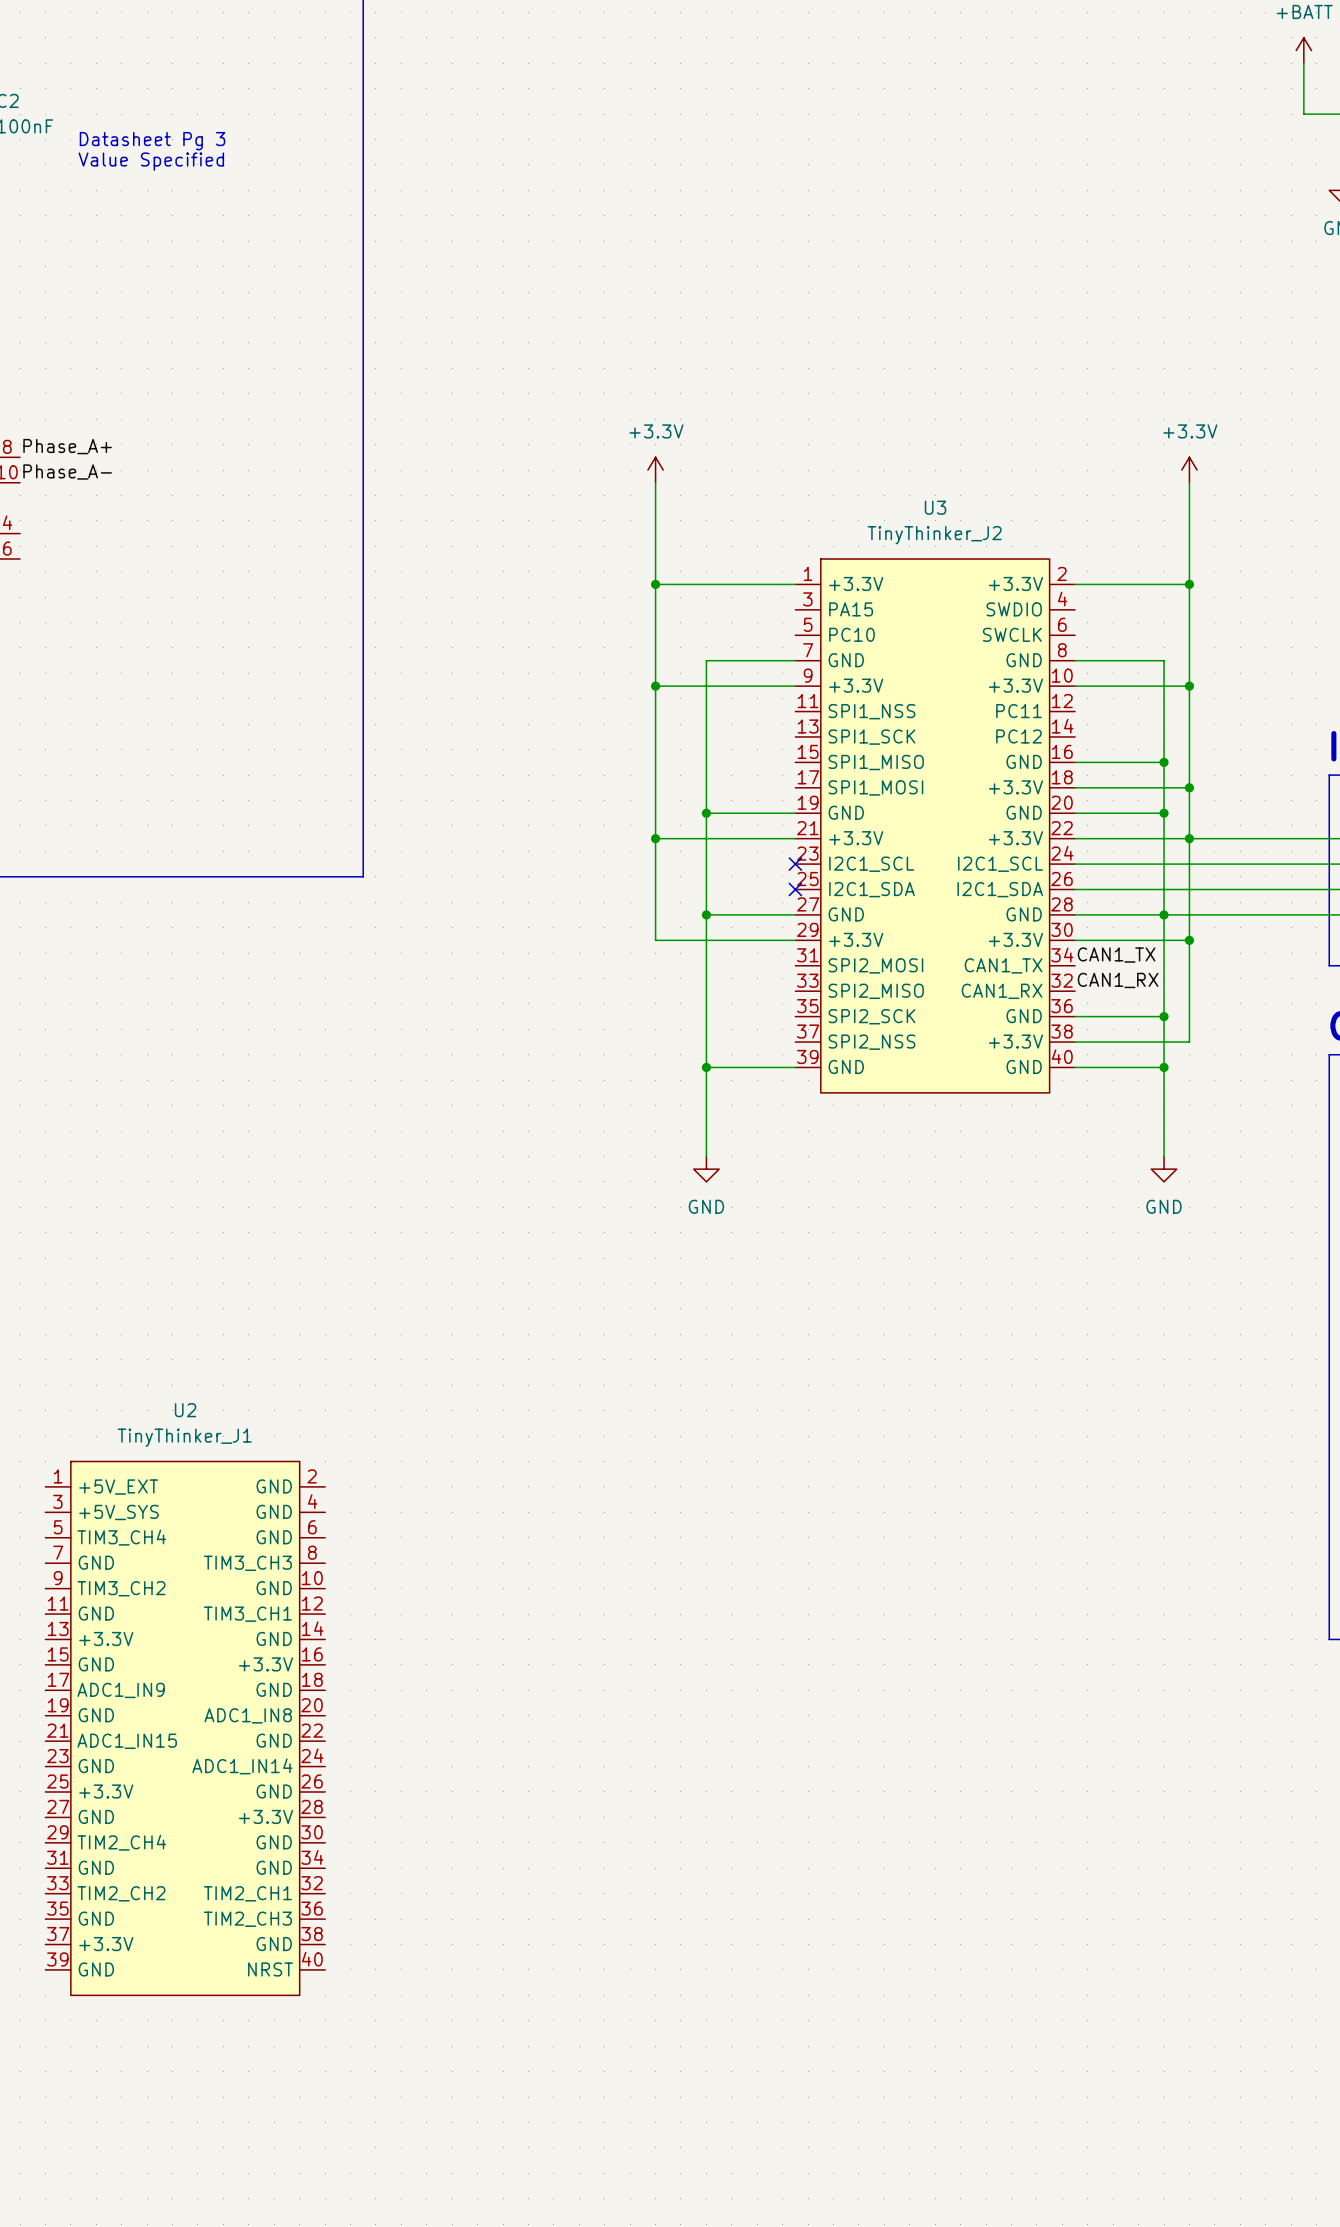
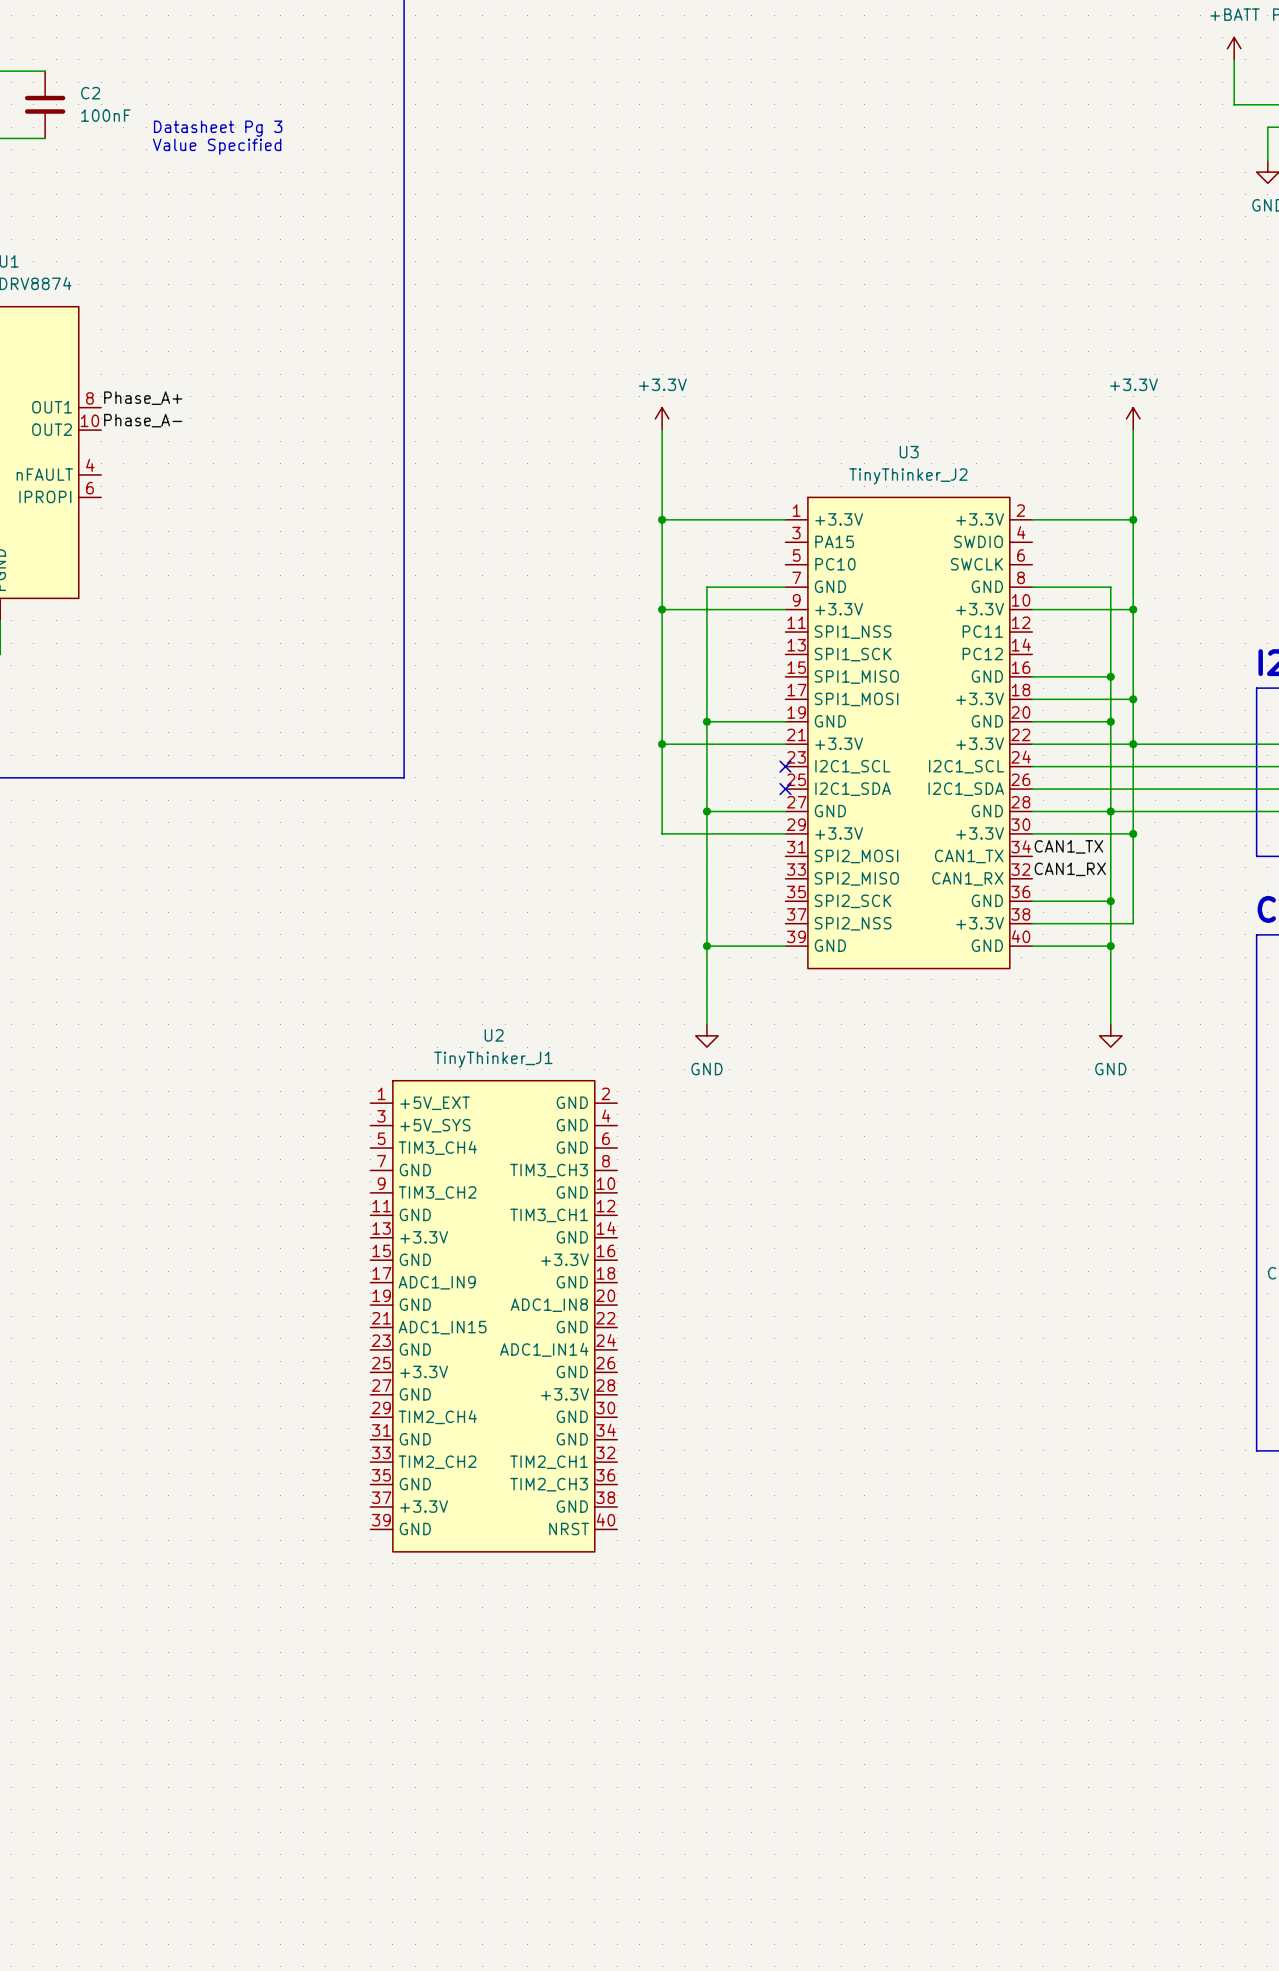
U2 position: (185, 1728) -> (493, 1316)

